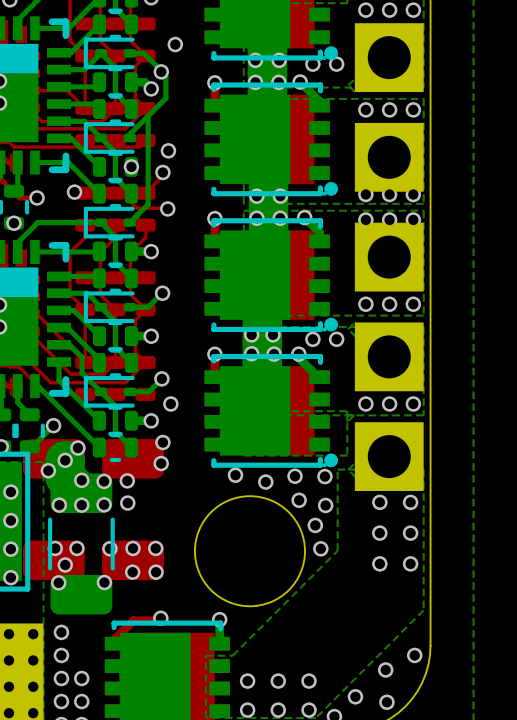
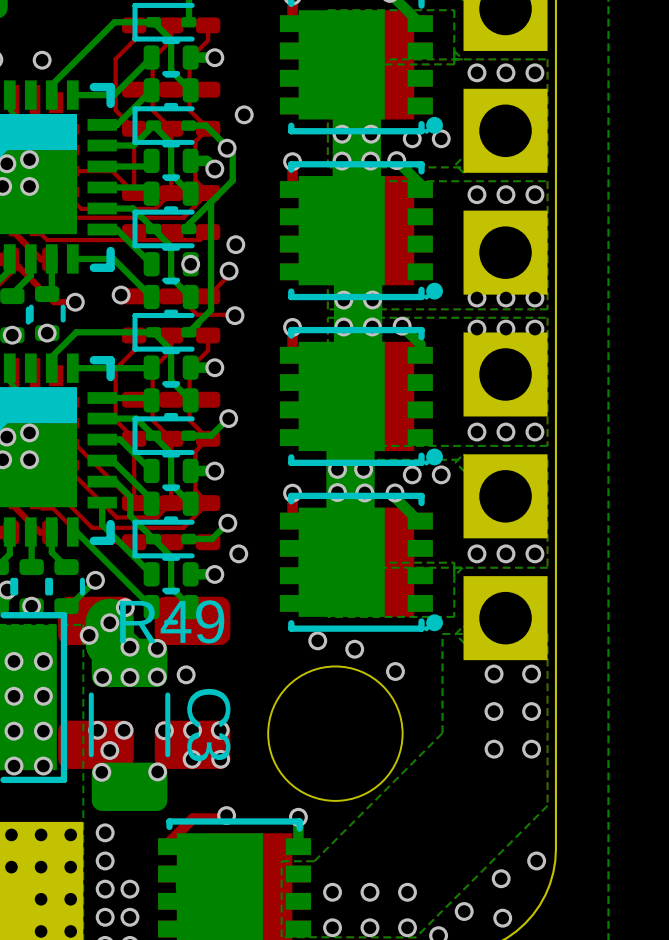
via: (162, 442) -> none
R49 name: none -> R49 (172, 621)
via: (161, 463) -> none
via: (295, 476) -> none
via: (324, 476) -> none
via: (127, 480) -> none
via: (325, 505) -> none
via: (315, 525) -> none
C3 name: none -> C3 (208, 725)
via: (320, 548) -> none

